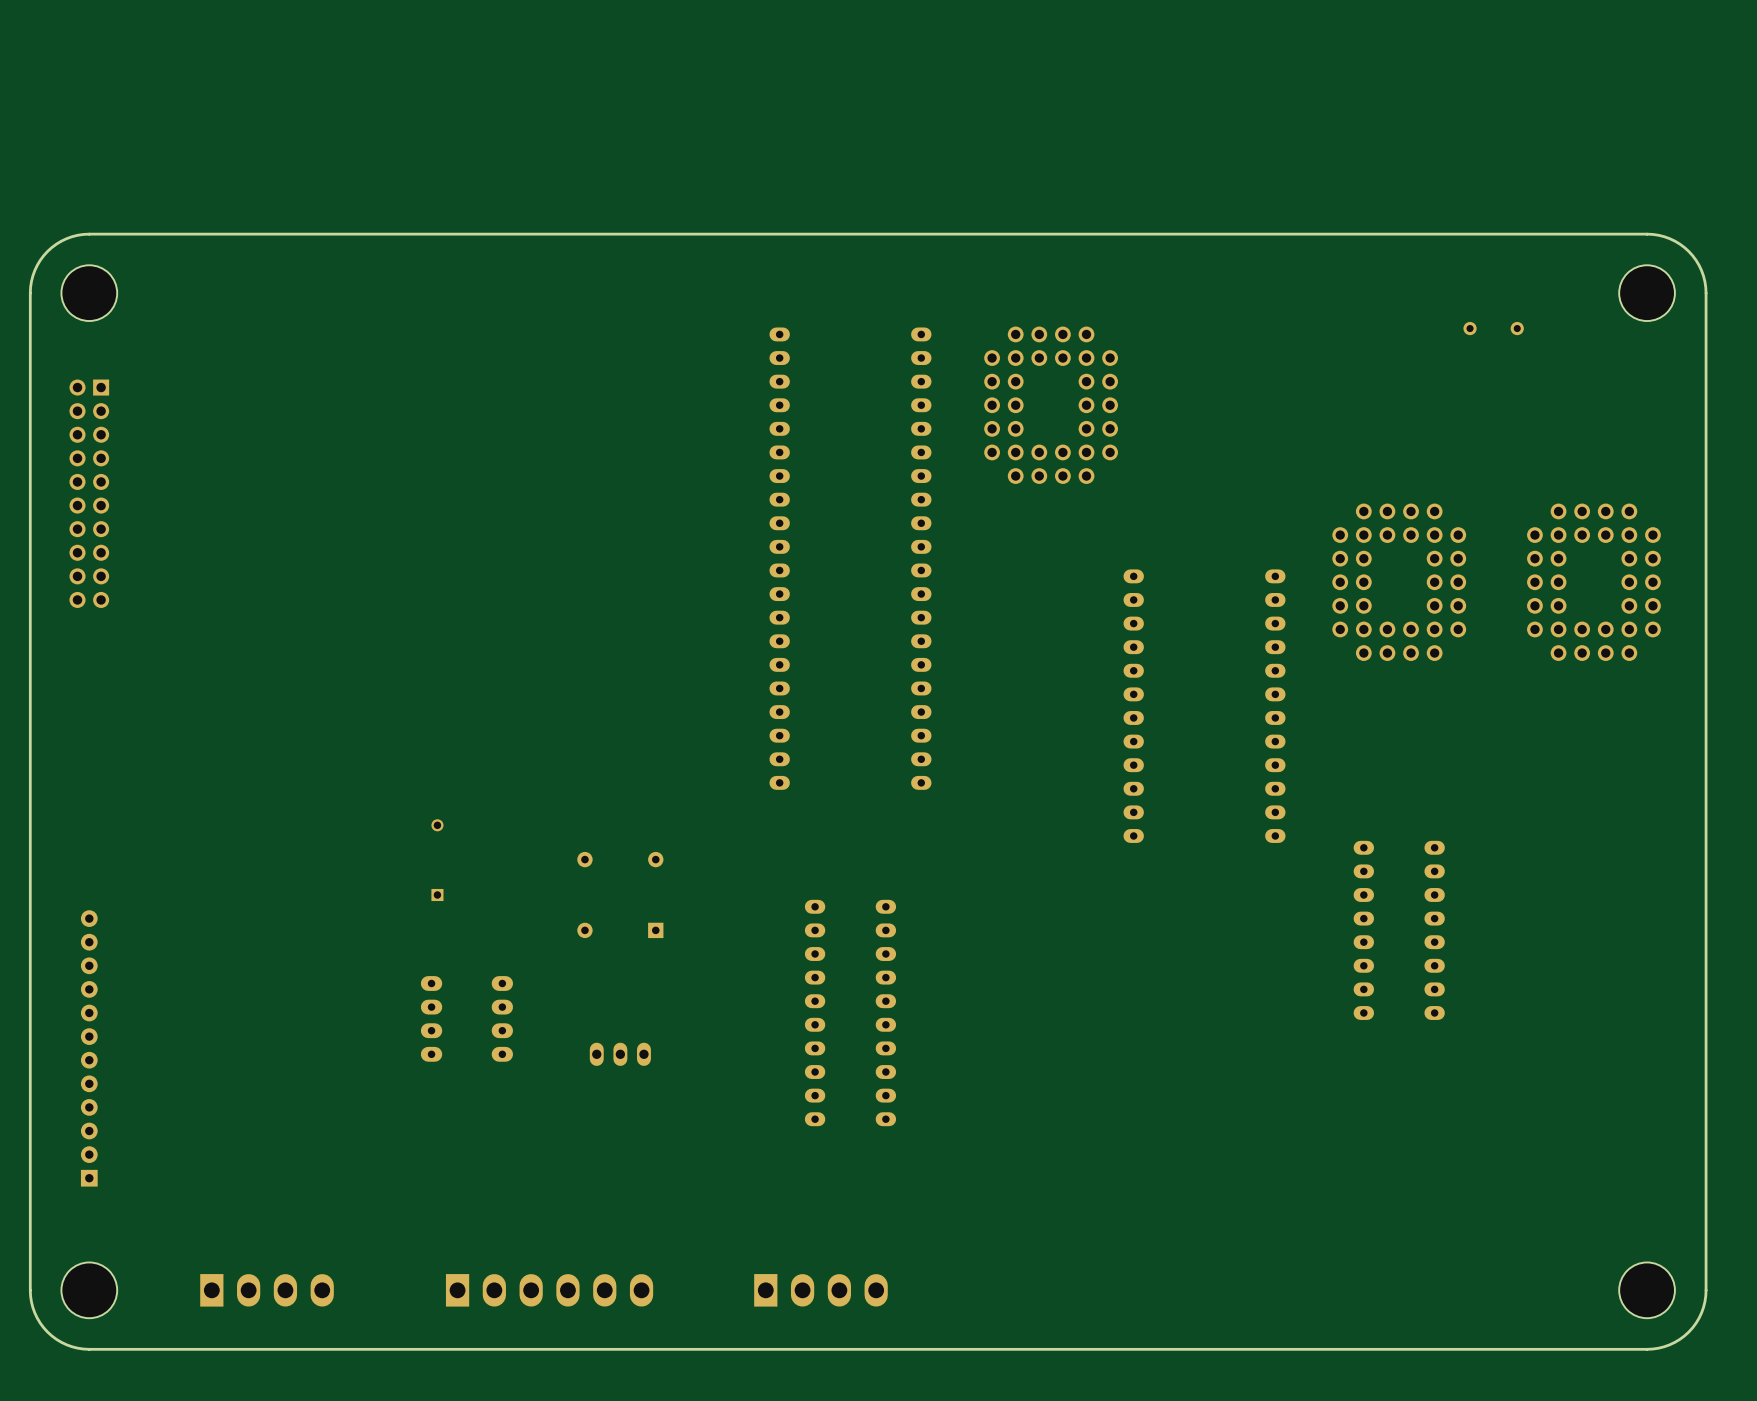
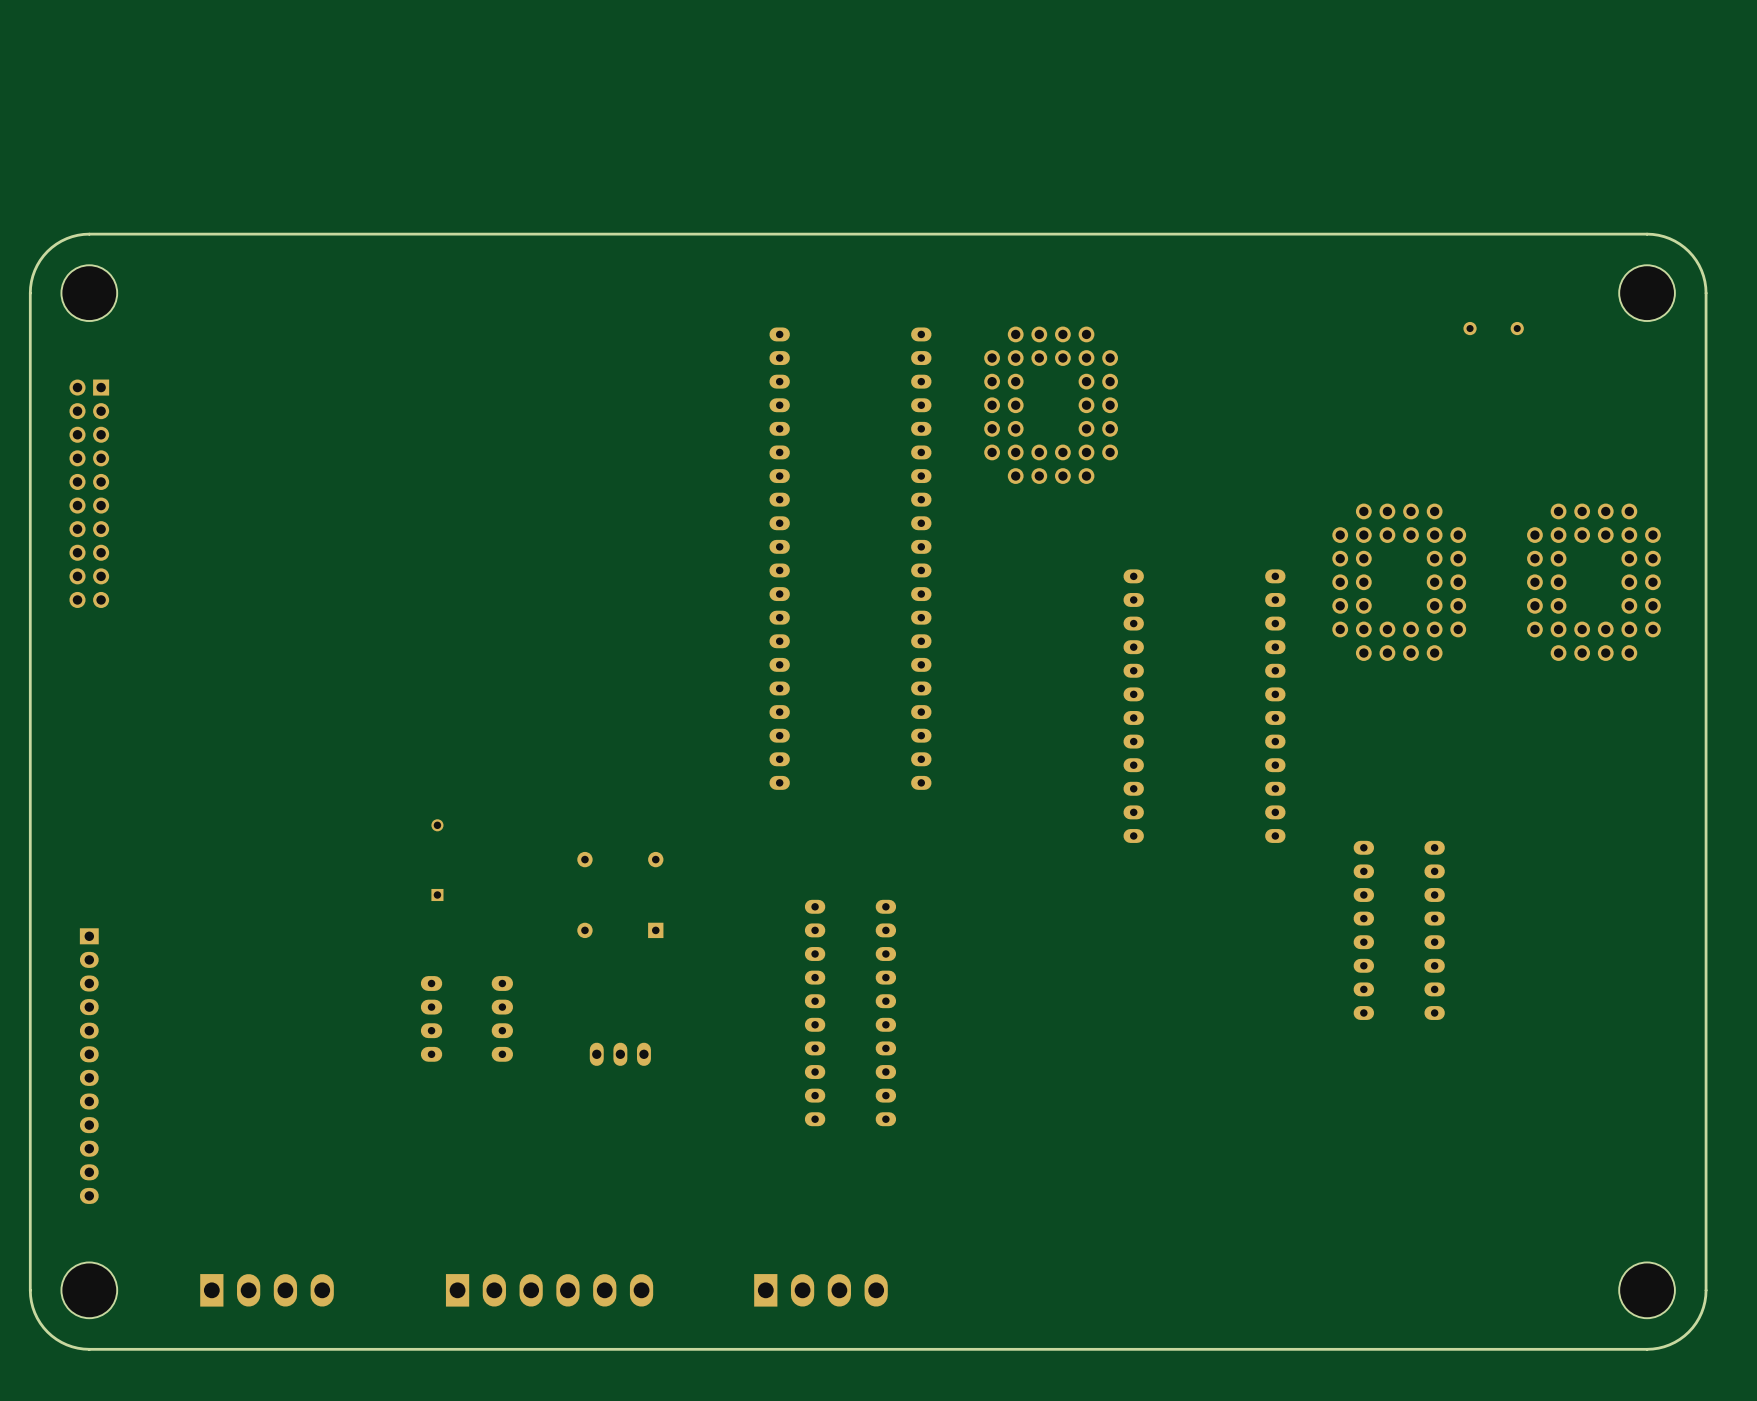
part: (89, 1048) -> none
part: none -> (89, 1066)

